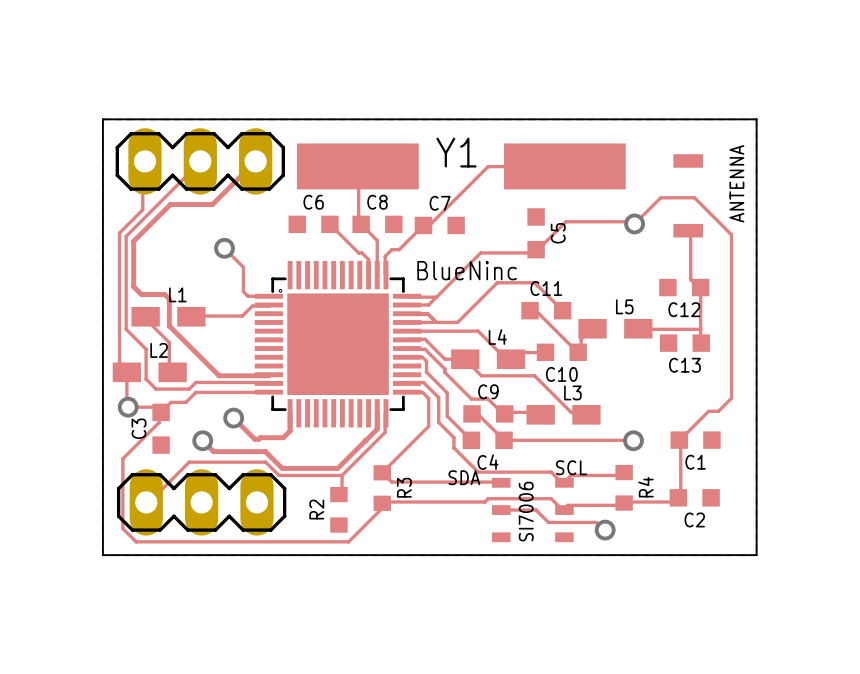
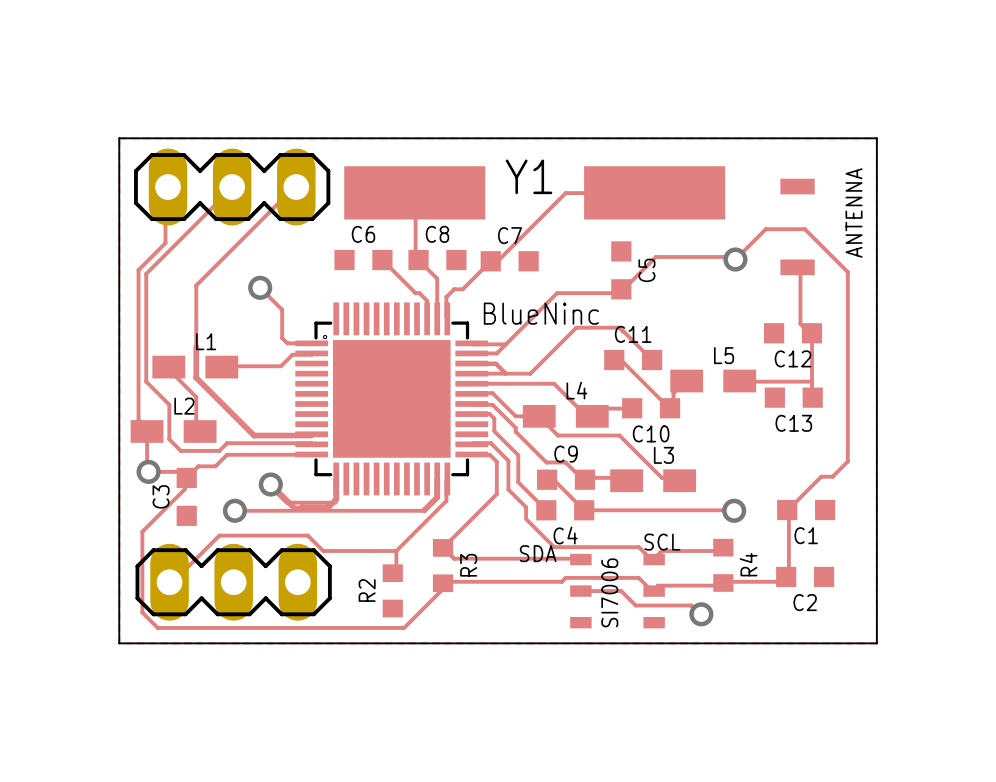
track: (255, 161) (212, 204) (170, 204) (133, 241) (133, 286) (141, 294) (164, 294) (169, 299) -> (292, 189) (196, 285) (196, 346)
track: none -> (265, 481) (286, 502) (335, 502)
track: (202, 440) (213, 451) (265, 451) (283, 468) -> (234, 510) (424, 510) (437, 497)
track: (365, 440) (337, 468) (283, 468) -> none

